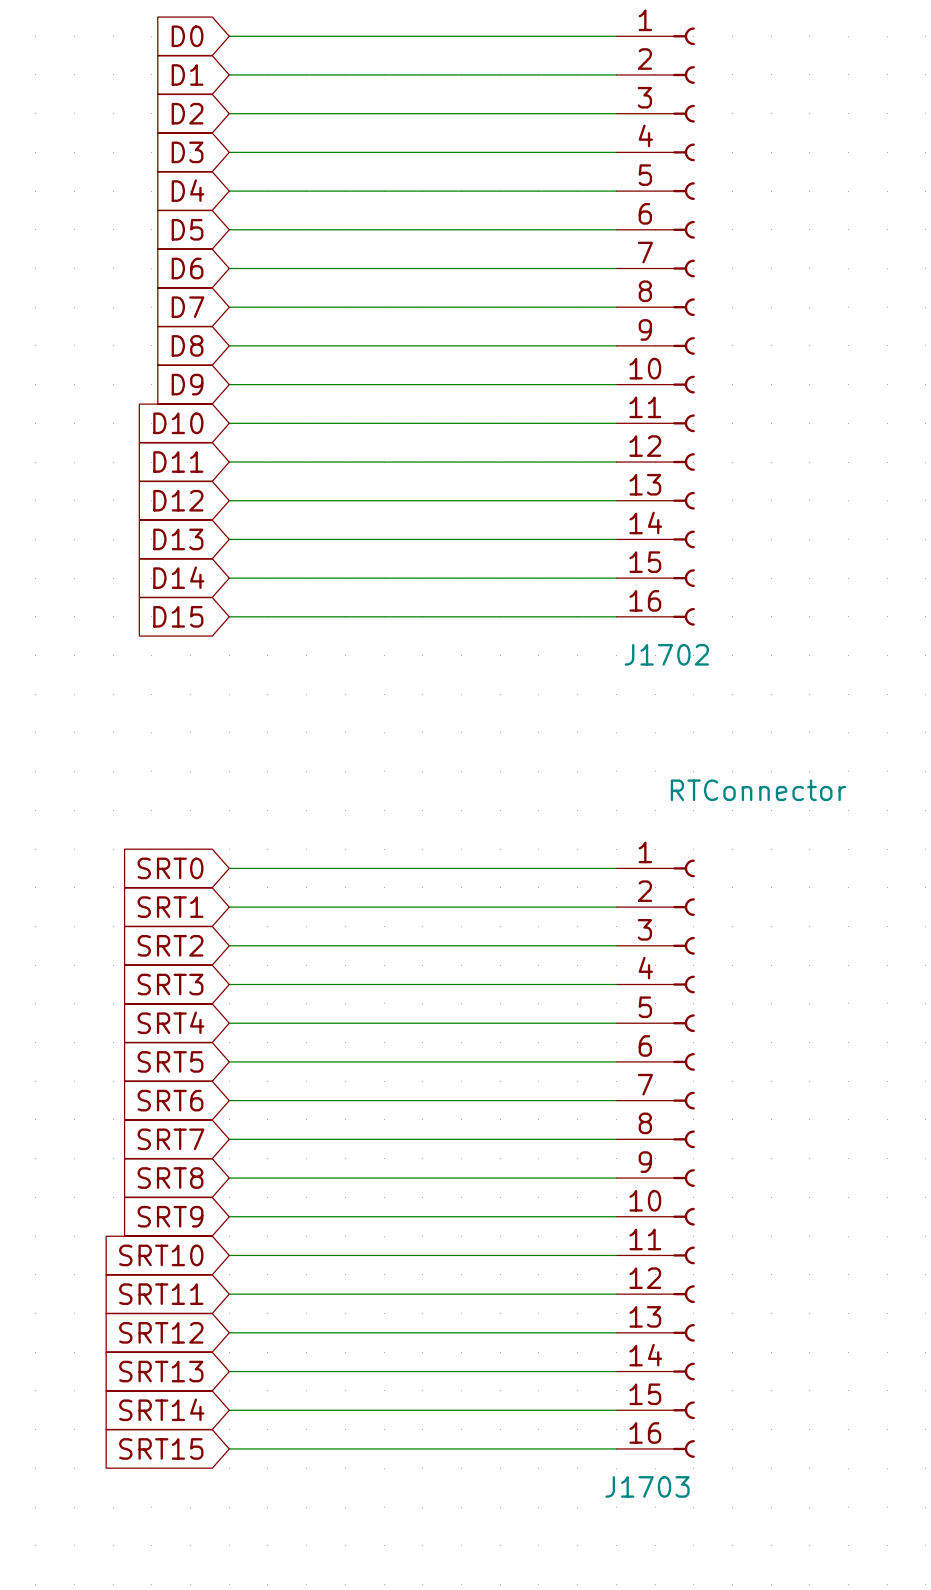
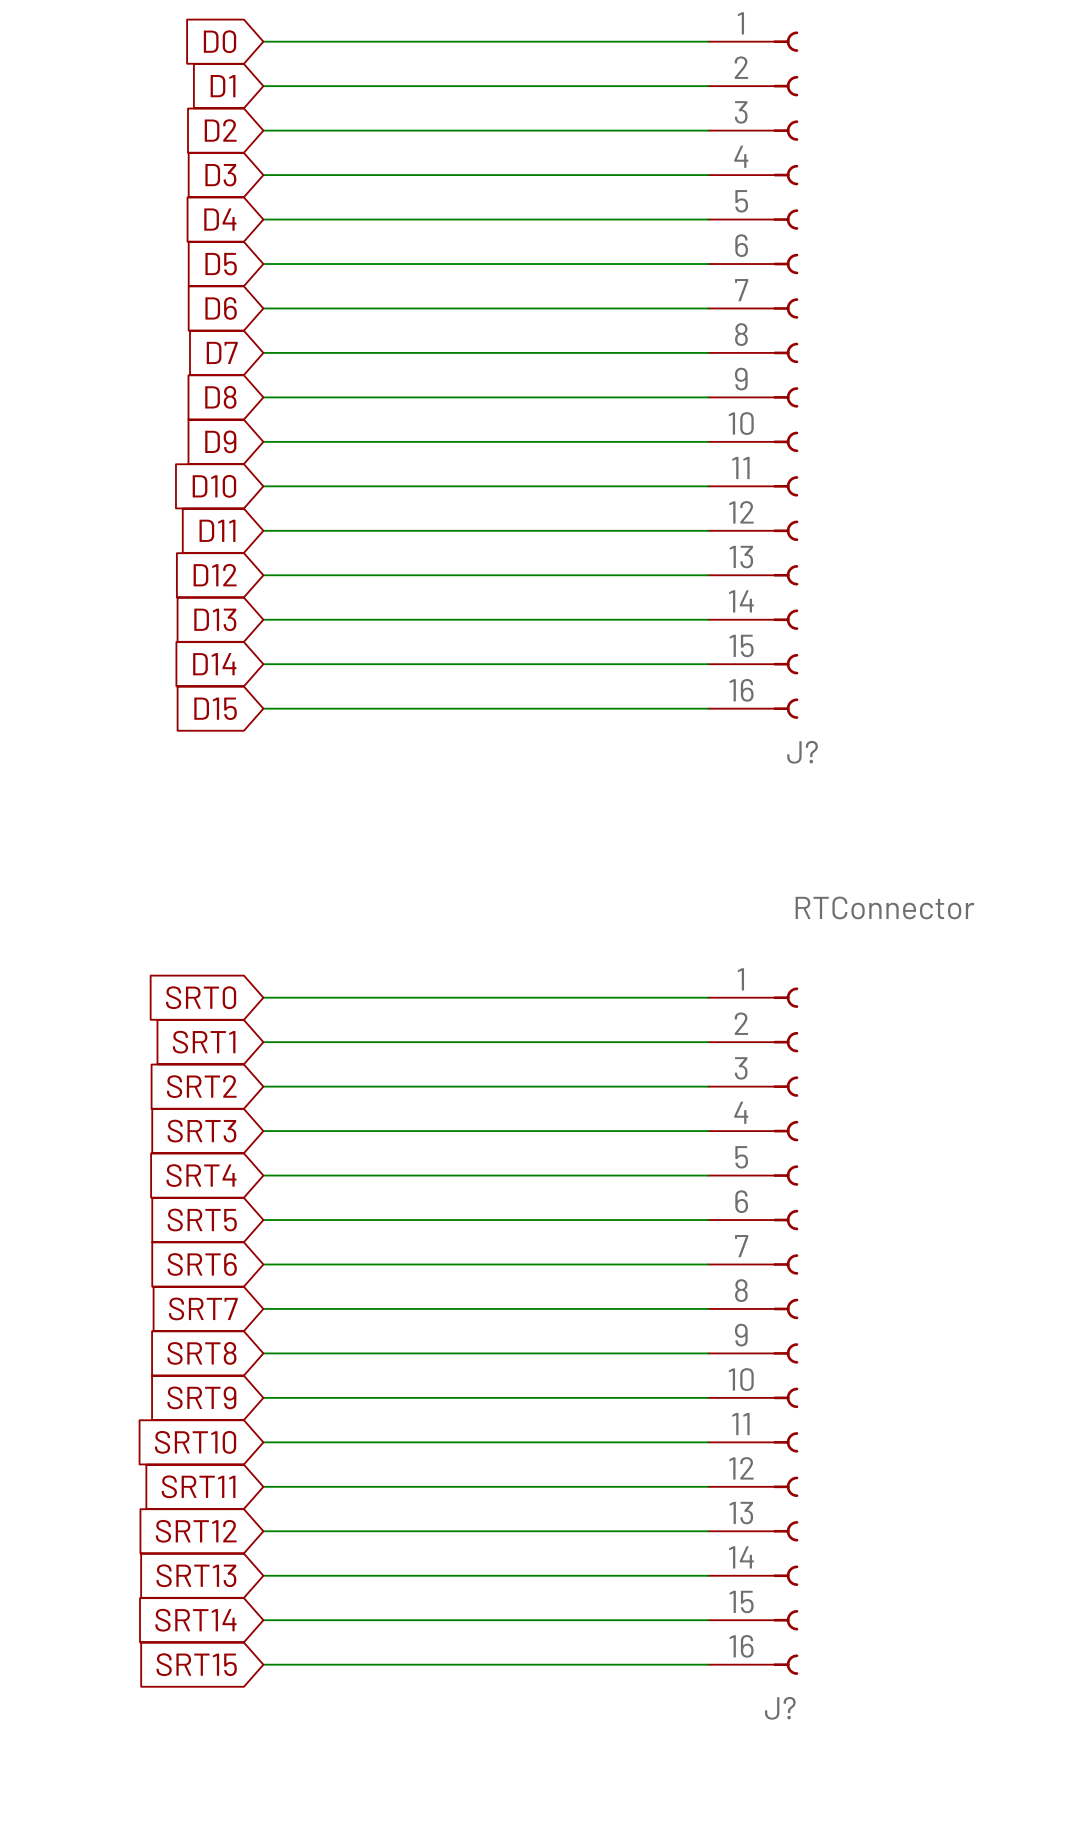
J1702 name: J1702 (666, 654) -> J? (802, 752)
J1703 name: J1703 (647, 1486) -> J? (780, 1708)

